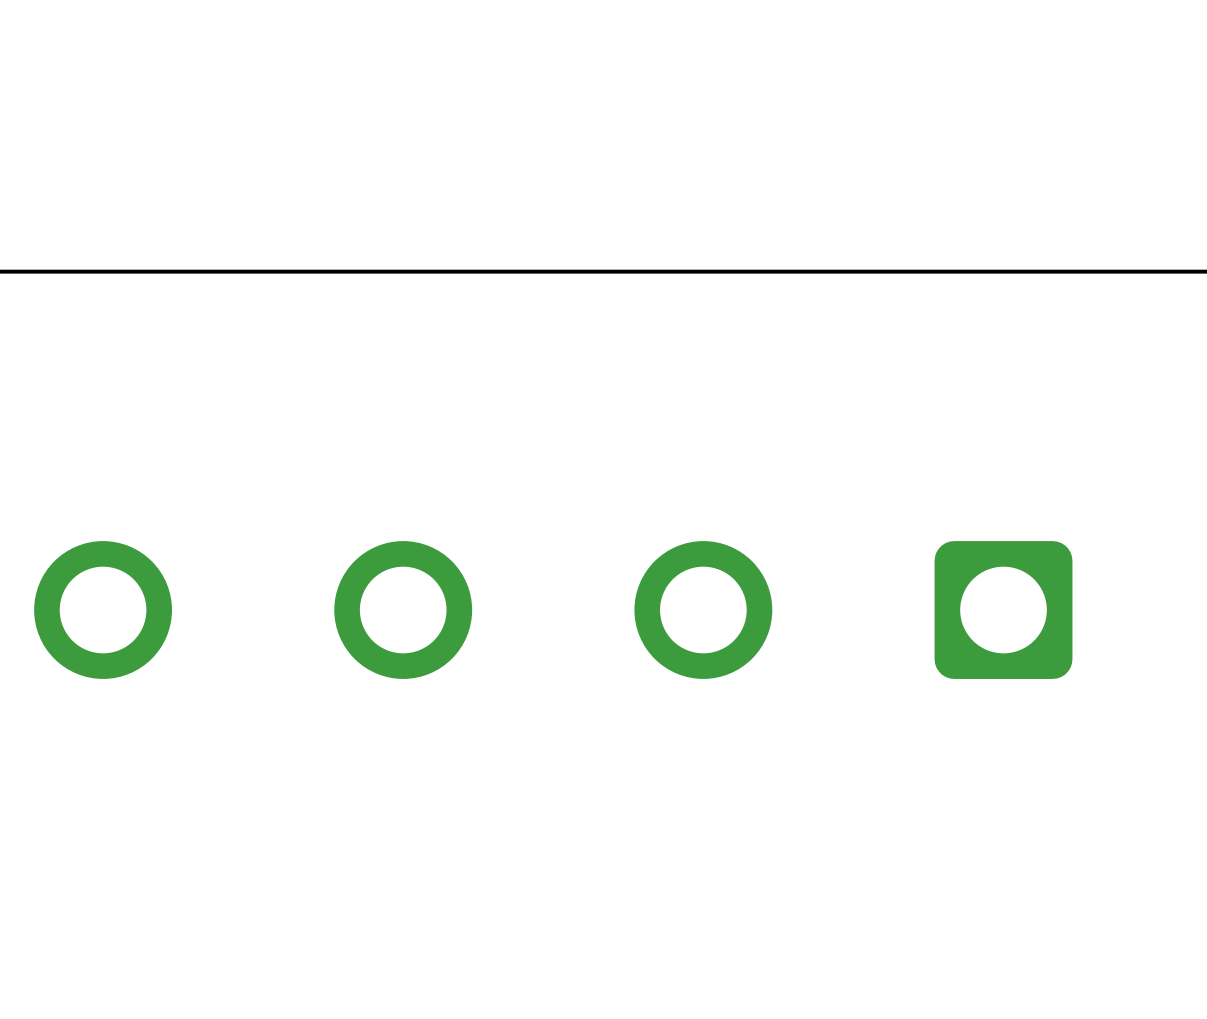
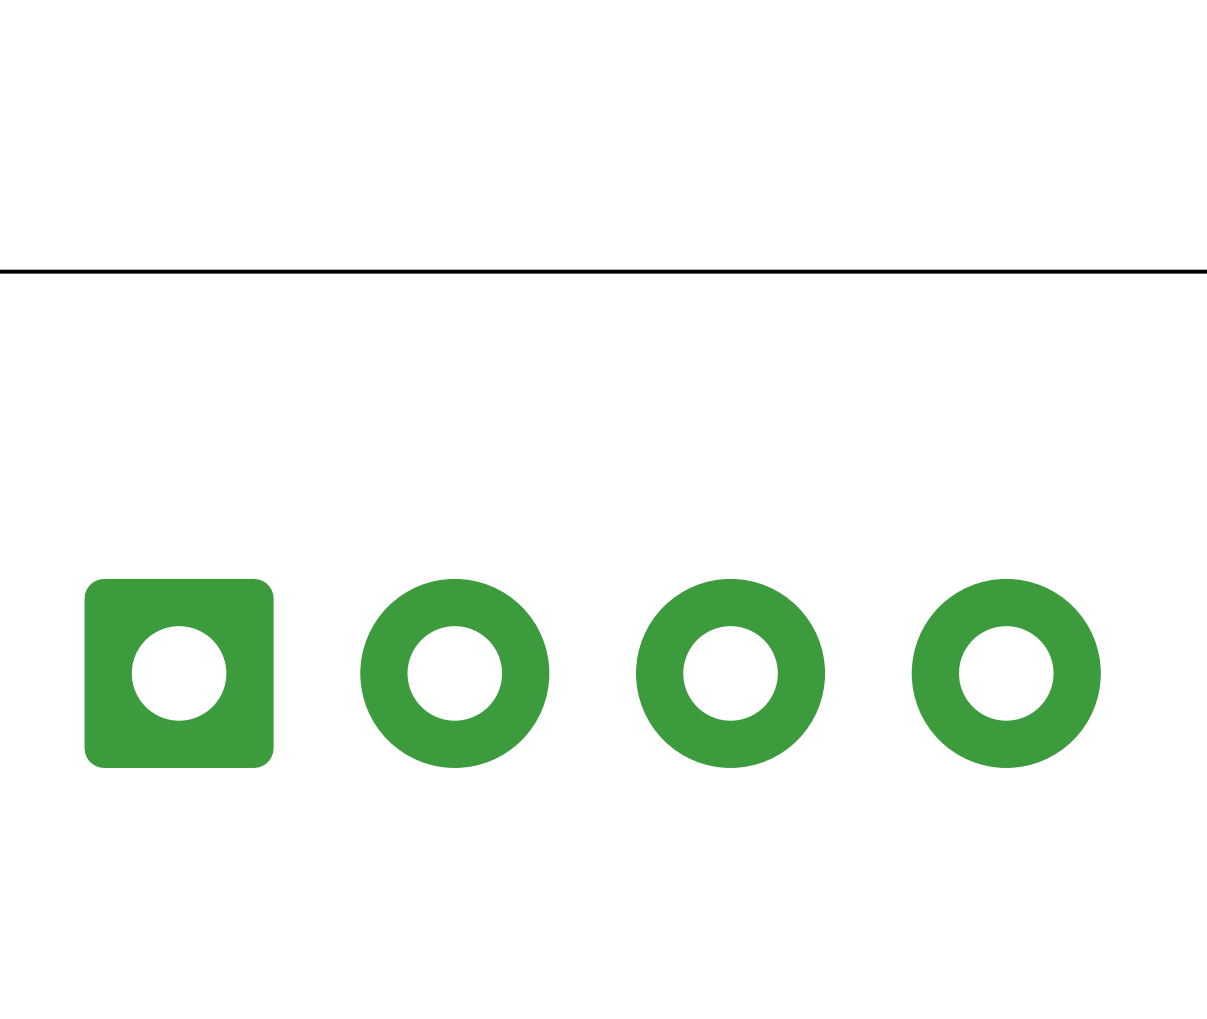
part footprint: [34, 541, 1073, 679] -> [84, 578, 1101, 768]

